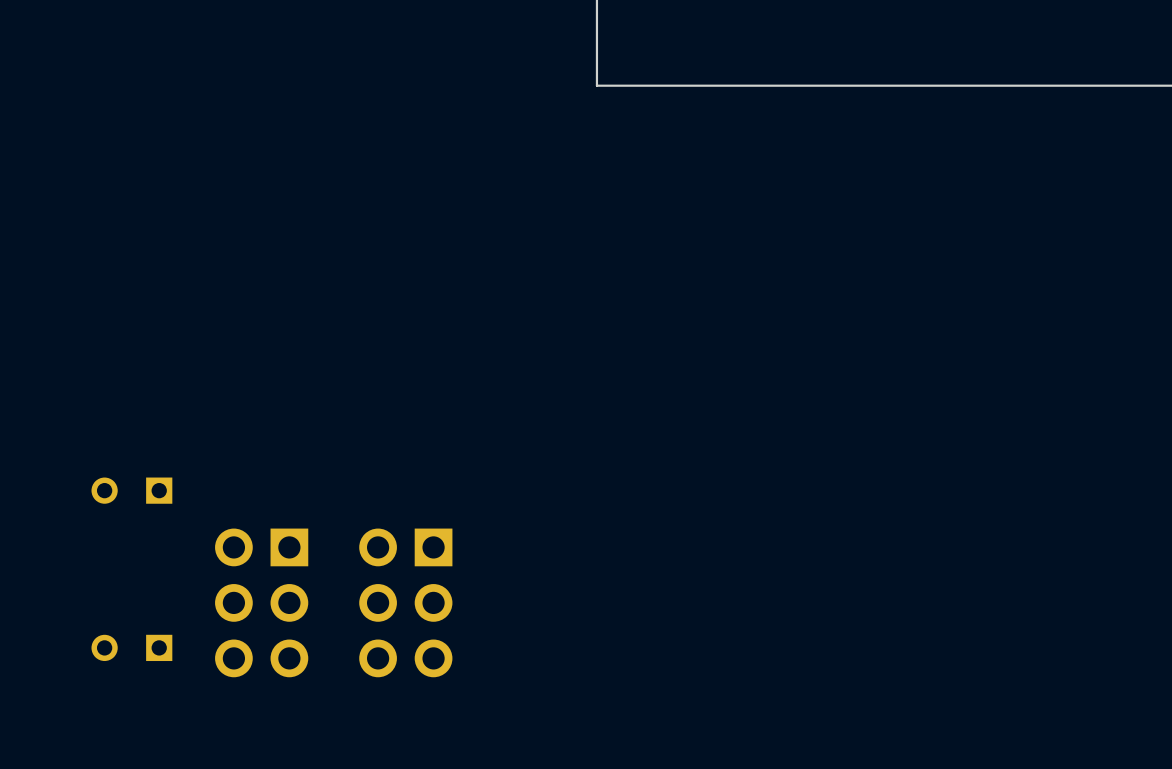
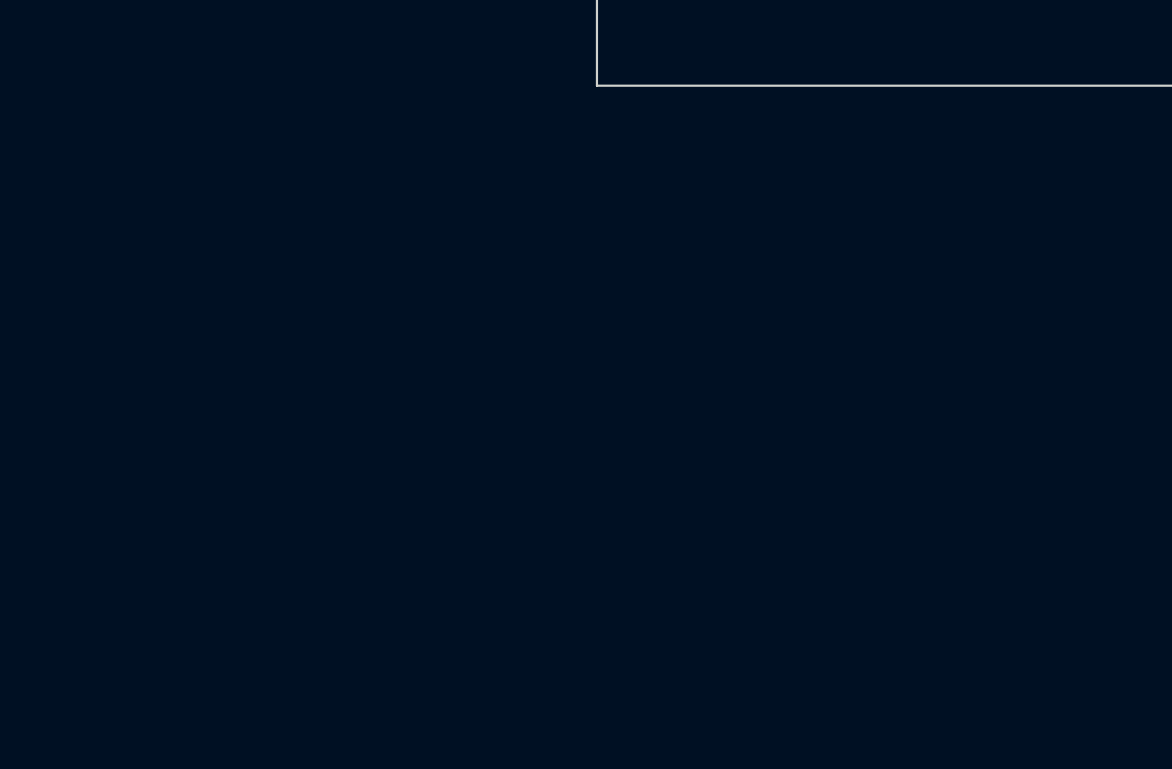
part: (131, 490) -> none
part: (261, 602) -> none
part: (405, 602) -> none
part: (131, 647) -> none

